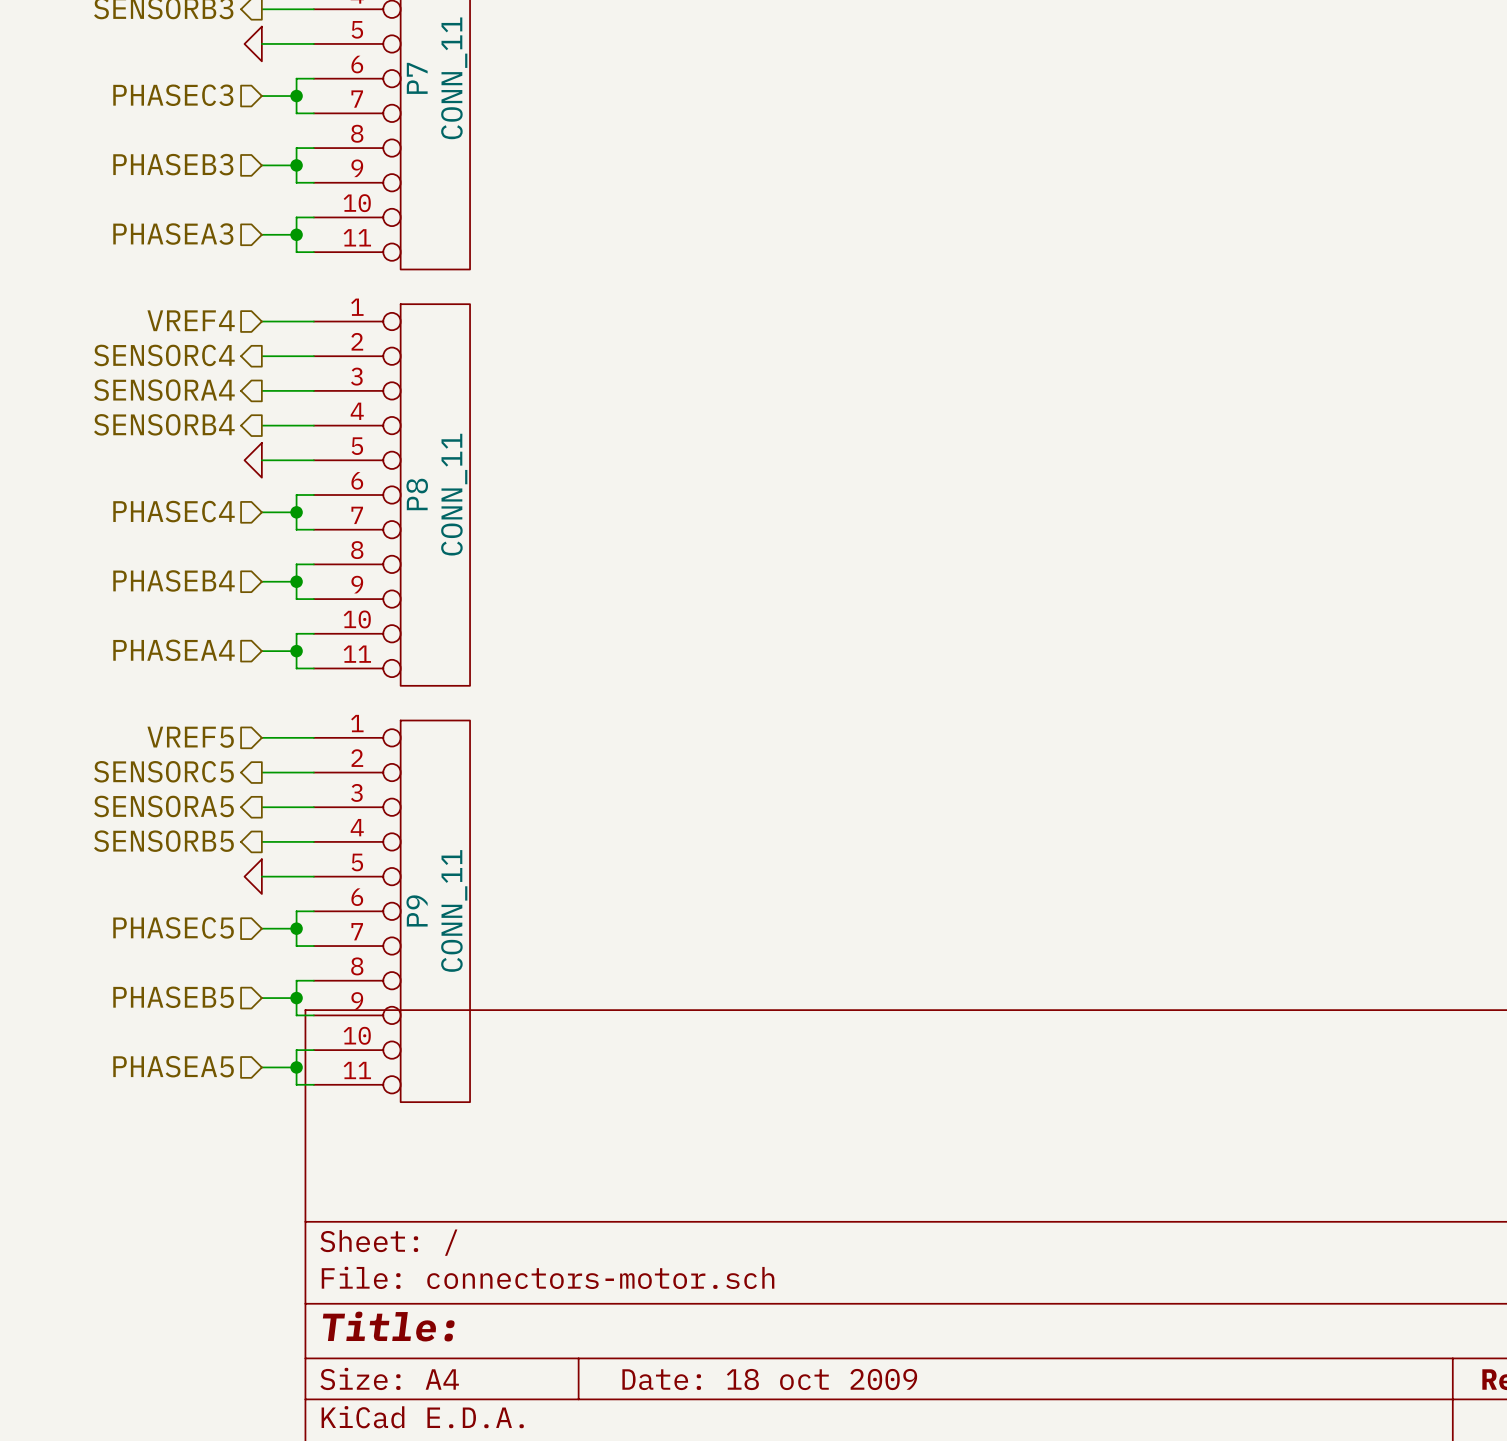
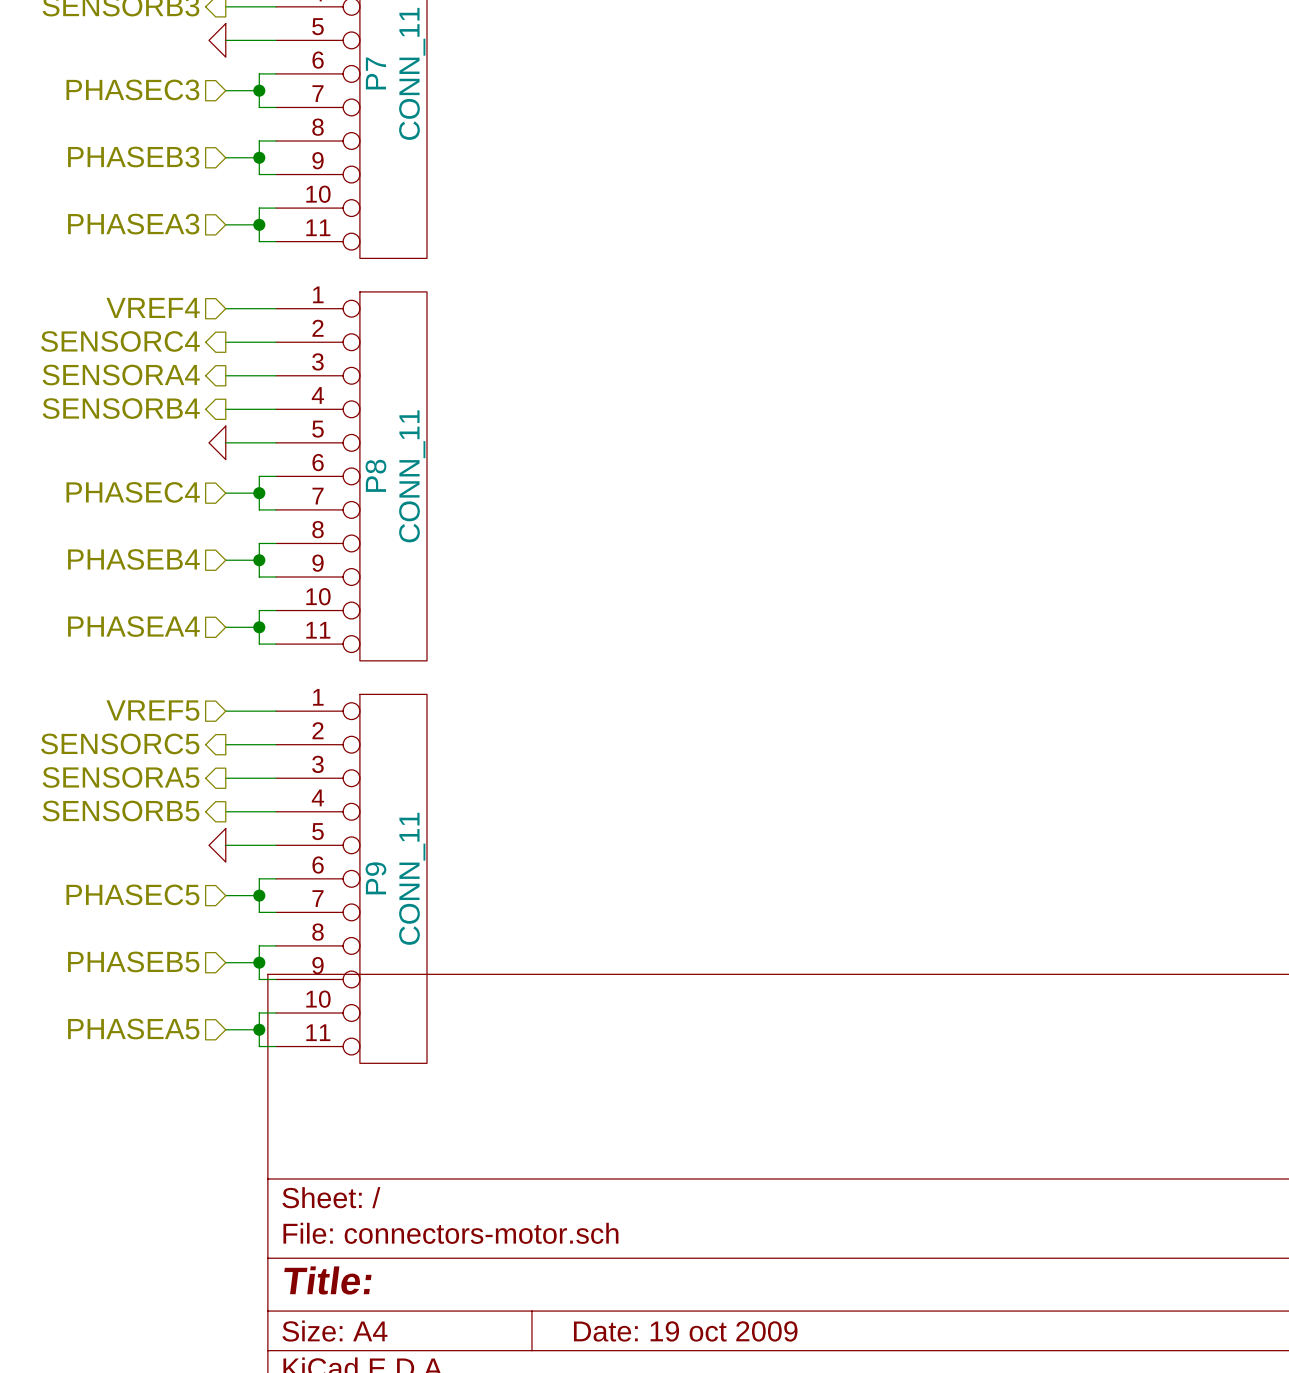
title block: Date: 18 oct 2009 (769, 1379) -> Date: 19 oct 2009 (685, 1331)

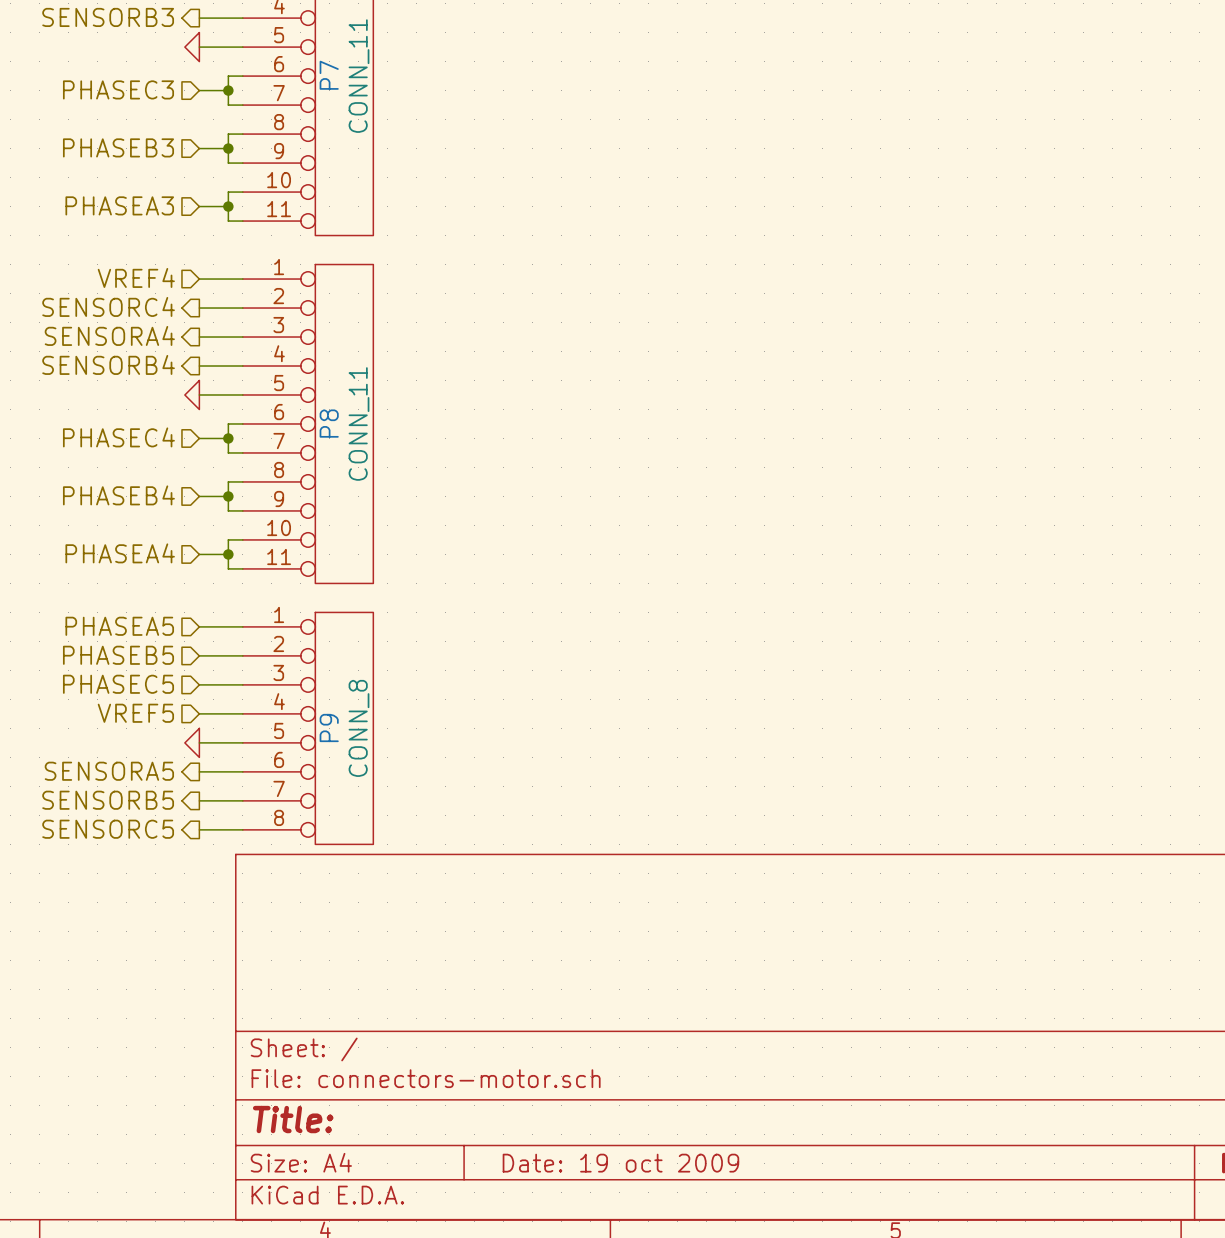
P9 symbol: [276, 694, 428, 1064] -> [242, 612, 374, 845]
hierarchical label: VREF5 (152, 710) -> PHASEA5 (119, 626)
hierarchical label shape: output (120, 743) -> input (118, 655)
hierarchical label: SENSORC5 (120, 743) -> PHASEB5 (118, 655)
hierarchical label shape: output (121, 777) -> input (118, 684)
hierarchical label: SENSORA5 (121, 777) -> PHASEC5 (118, 684)
hierarchical label shape: output (121, 811) -> input (135, 713)
hierarchical label: SENSORB5 (121, 811) -> VREF5 (135, 713)
hierarchical label: none -> SENSORA5 (109, 771)
wire: (259, 878) (259, 912) -> (228, 771) (199, 771)
P9 value: CONN_11 (412, 878) -> CONN_8 (359, 728)
hierarchical label: PHASEC5 (132, 894) -> none
wire: (225, 895) (259, 895) -> (199, 800) (228, 800)
junction: (259, 895) -> none
hierarchical label: none -> SENSORB5 (108, 800)
hierarchical label: none -> SENSORC5 (108, 829)
wire: (259, 945) (259, 979) (276, 979) -> (228, 829) (199, 829)
hierarchical label: PHASEB5 (133, 961) -> none
wire: (225, 962) (259, 962) -> none
junction: (259, 962) -> none
wire: (276, 1013) (259, 1013) (259, 1046) (276, 1046) -> none
hierarchical label: PHASEA5 (133, 1029) -> none
wire: (225, 1029) (259, 1029) -> none
junction: (259, 1029) -> none

